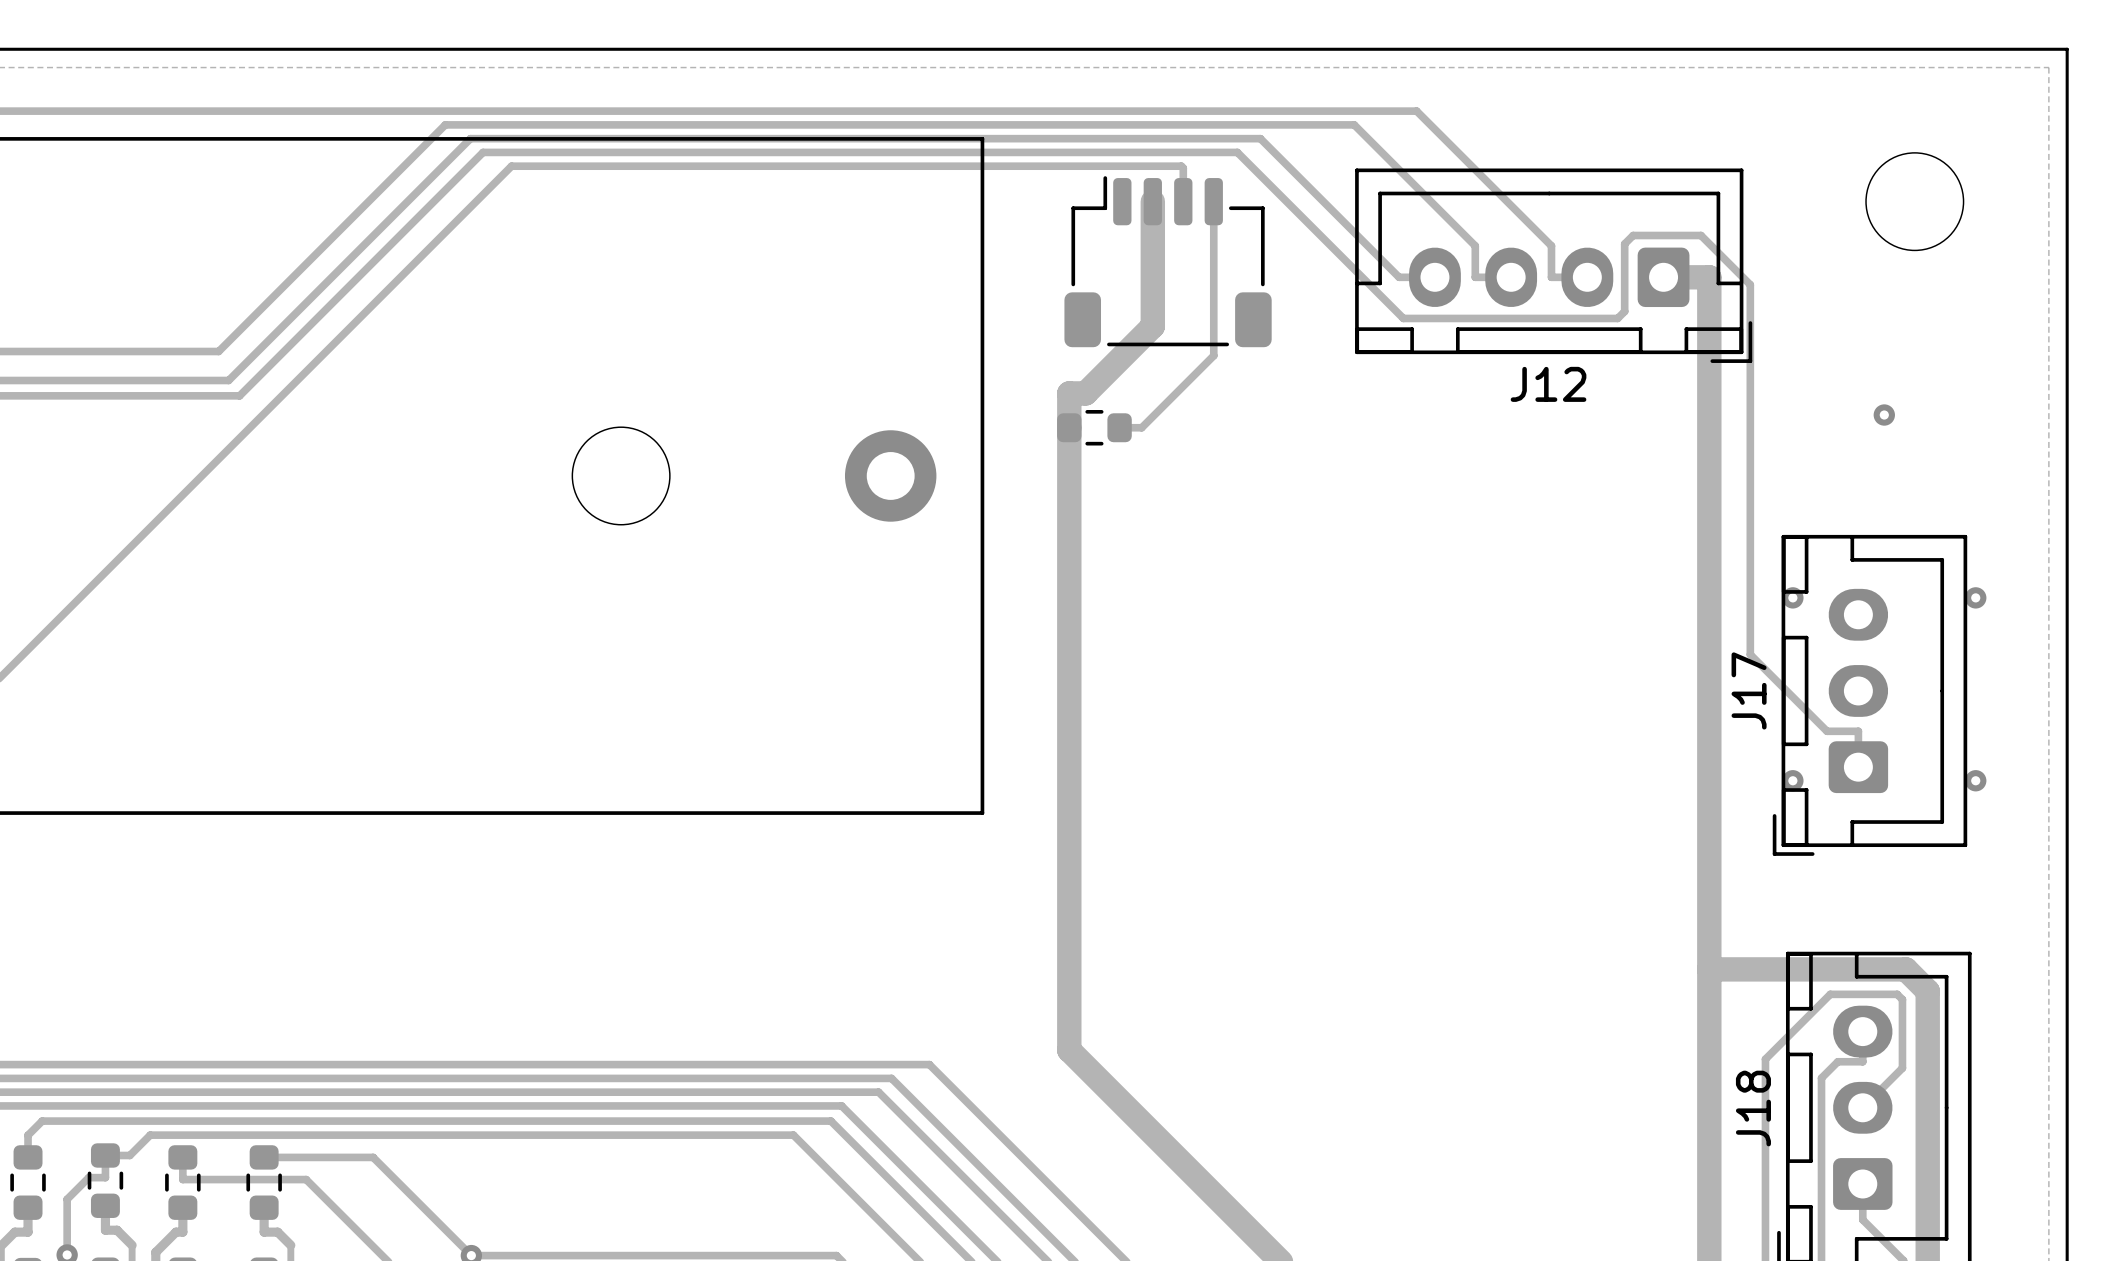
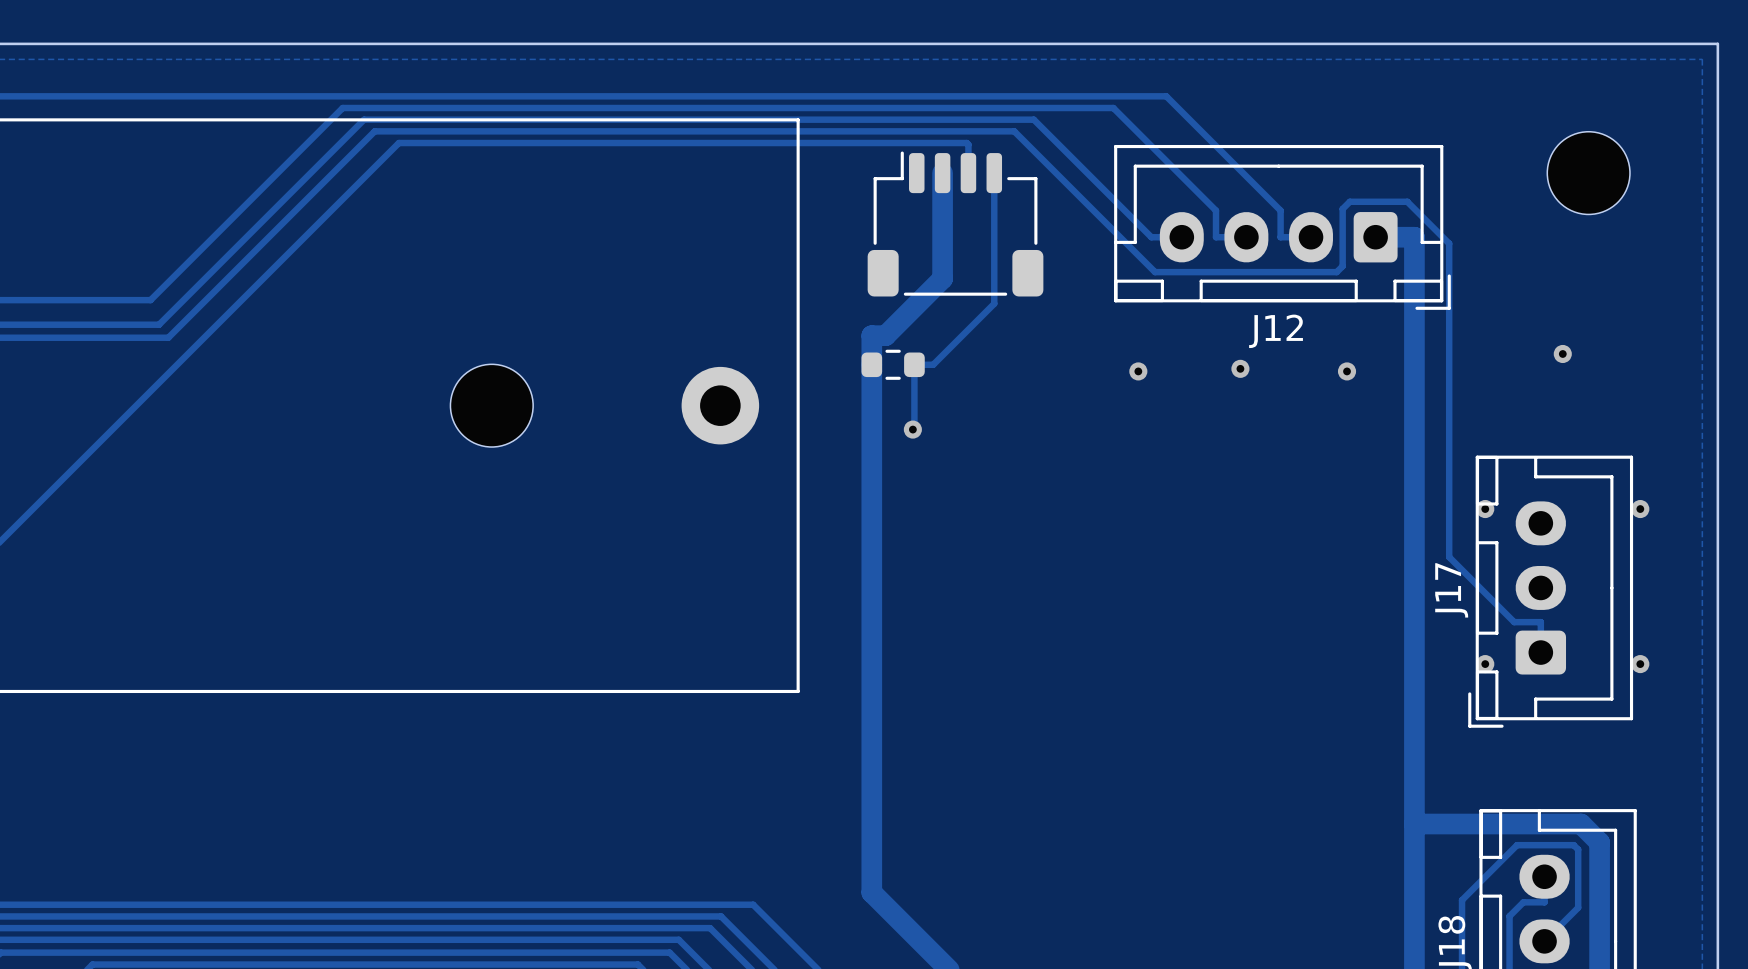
track: none -> (914, 364) (914, 428) (912, 429)
via: none -> (1240, 368)
via: none -> (1138, 371)
via: none -> (1347, 371)
via: none -> (912, 429)

